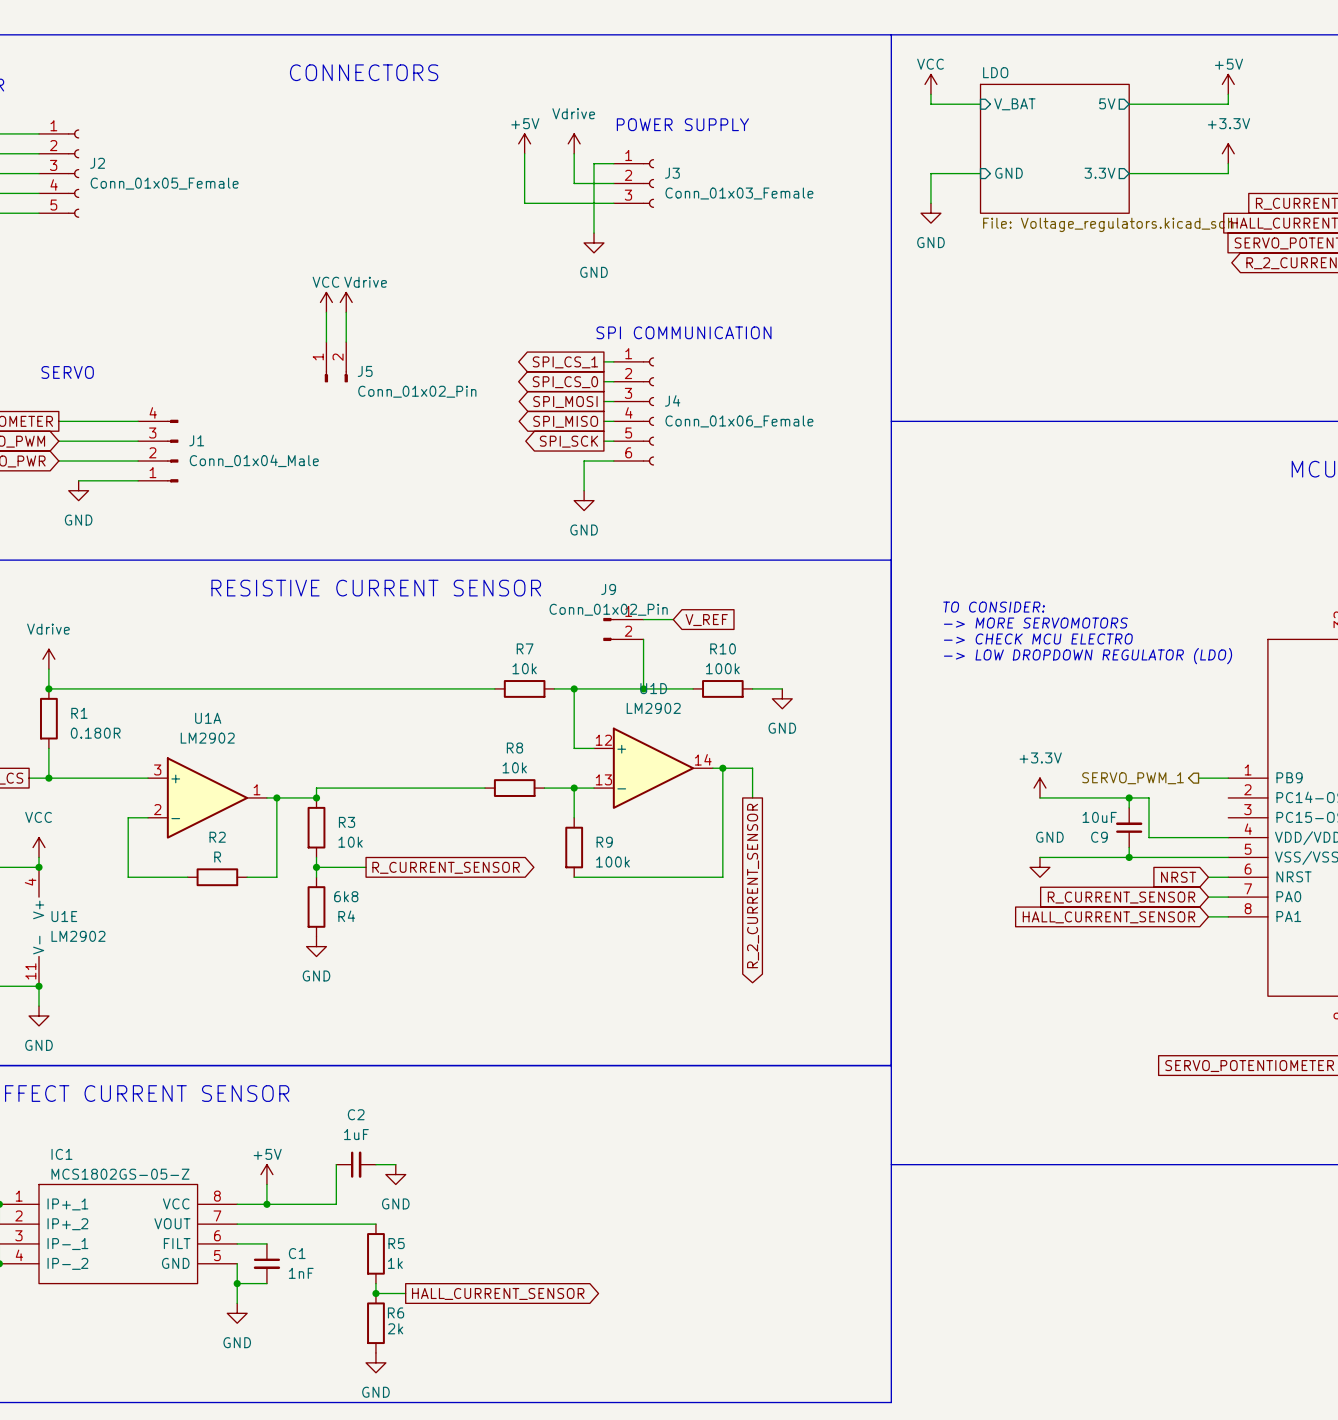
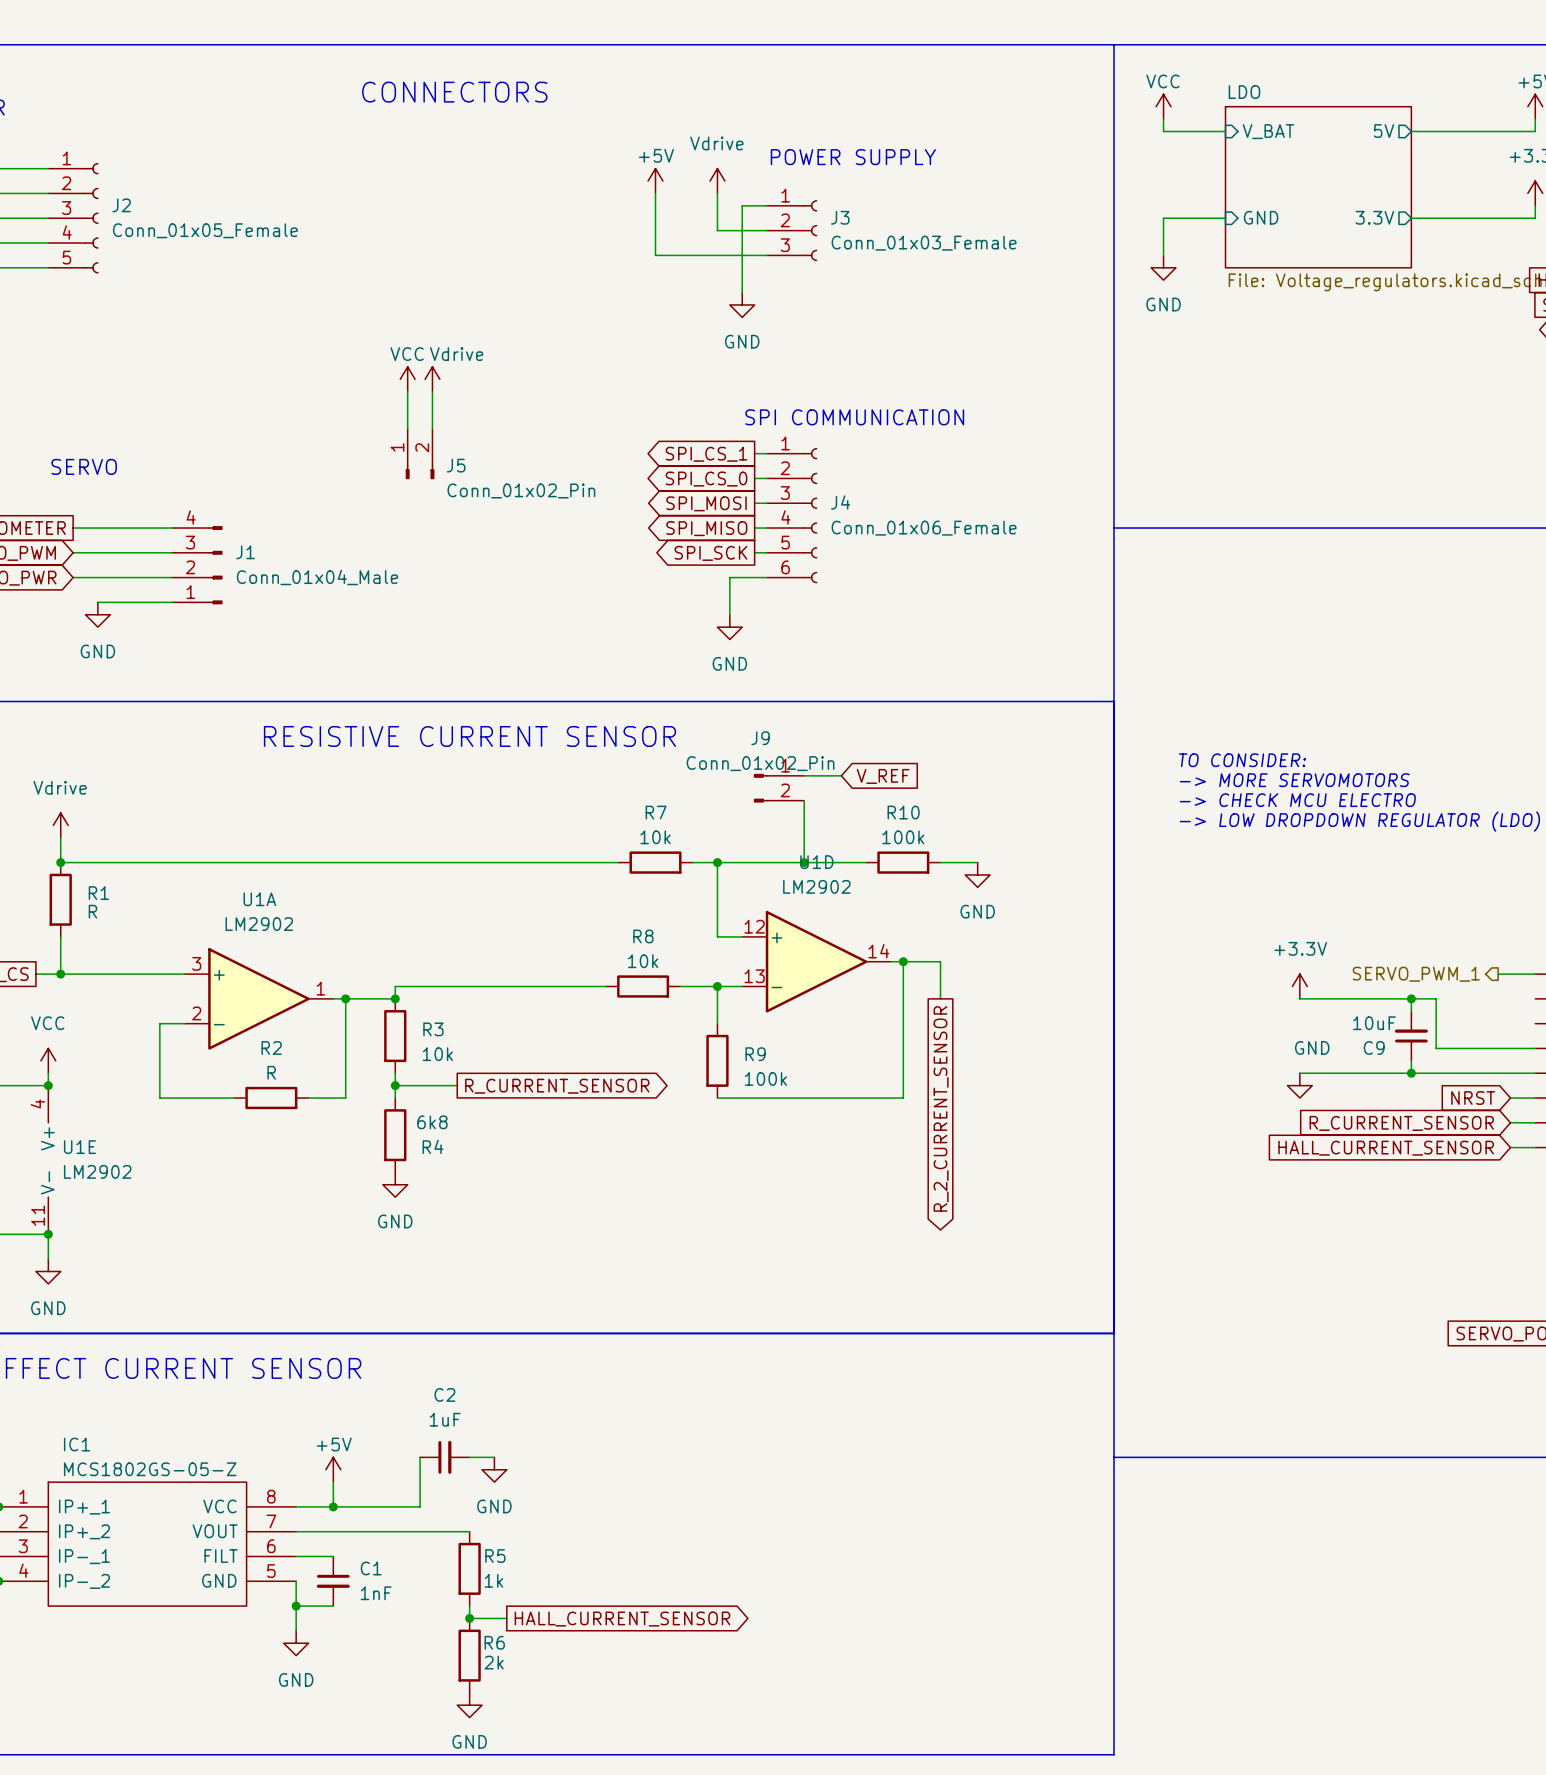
R1 value: 0.180R (95, 733) -> R (92, 911)

